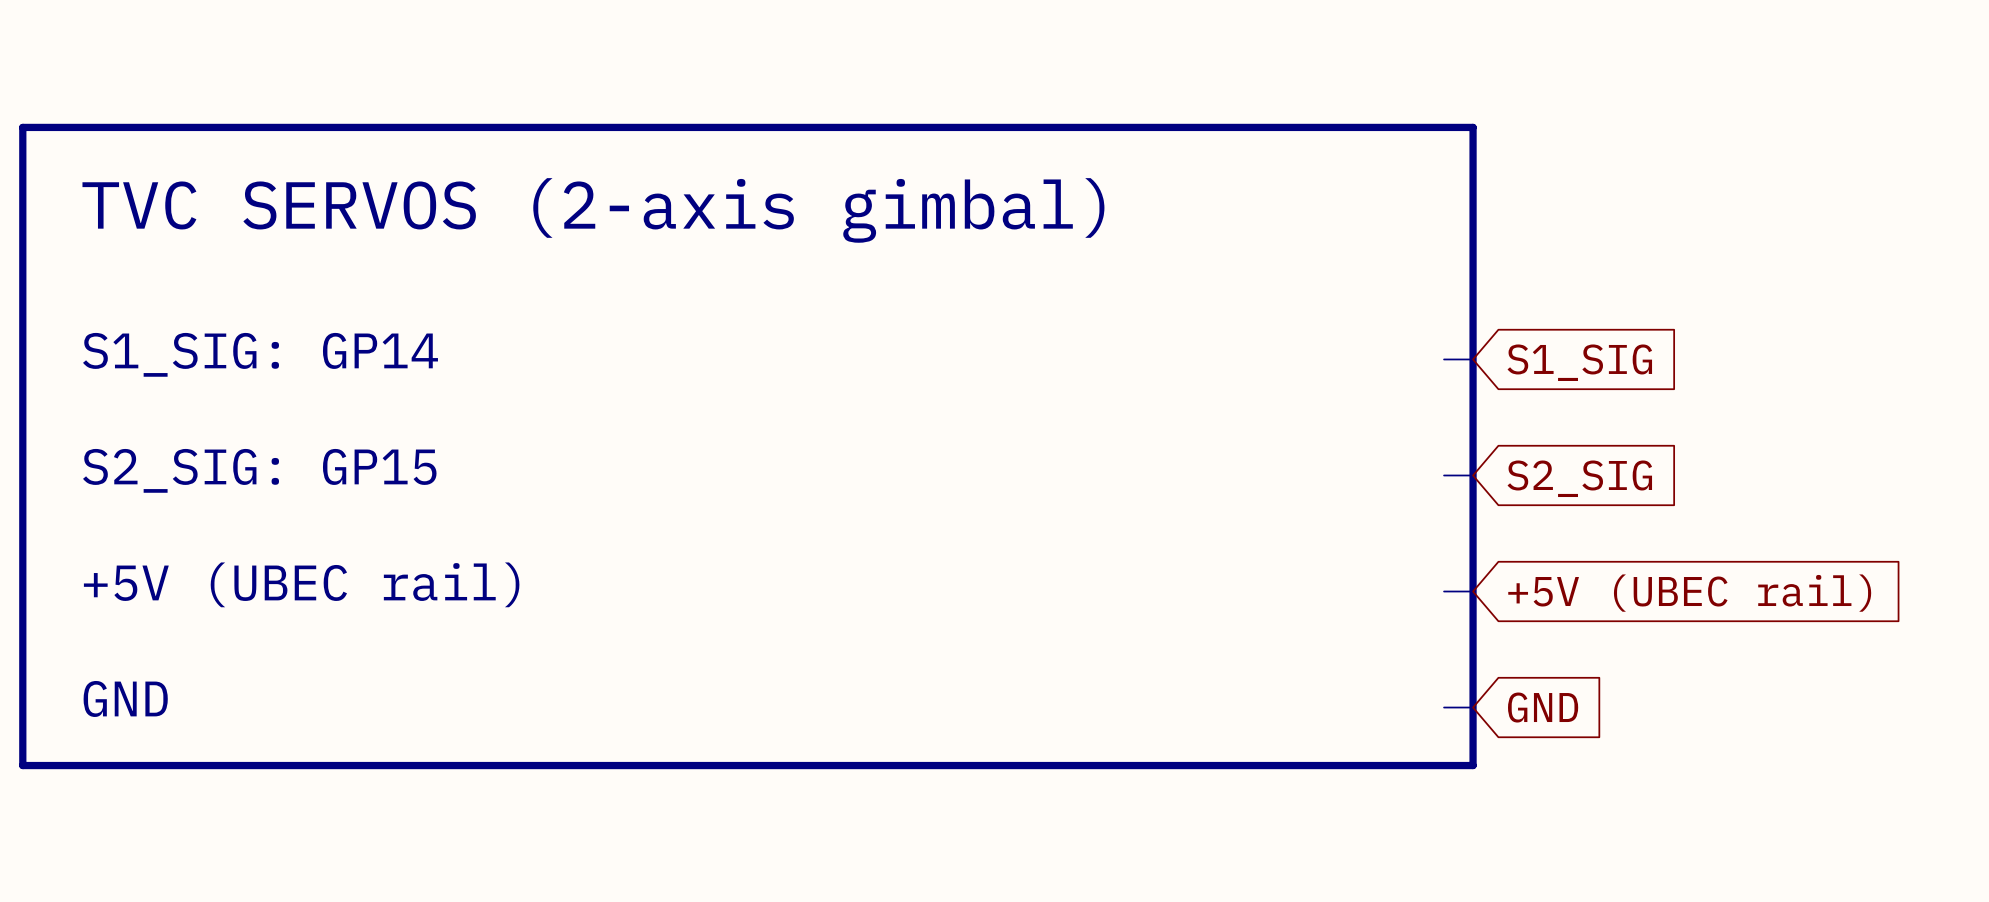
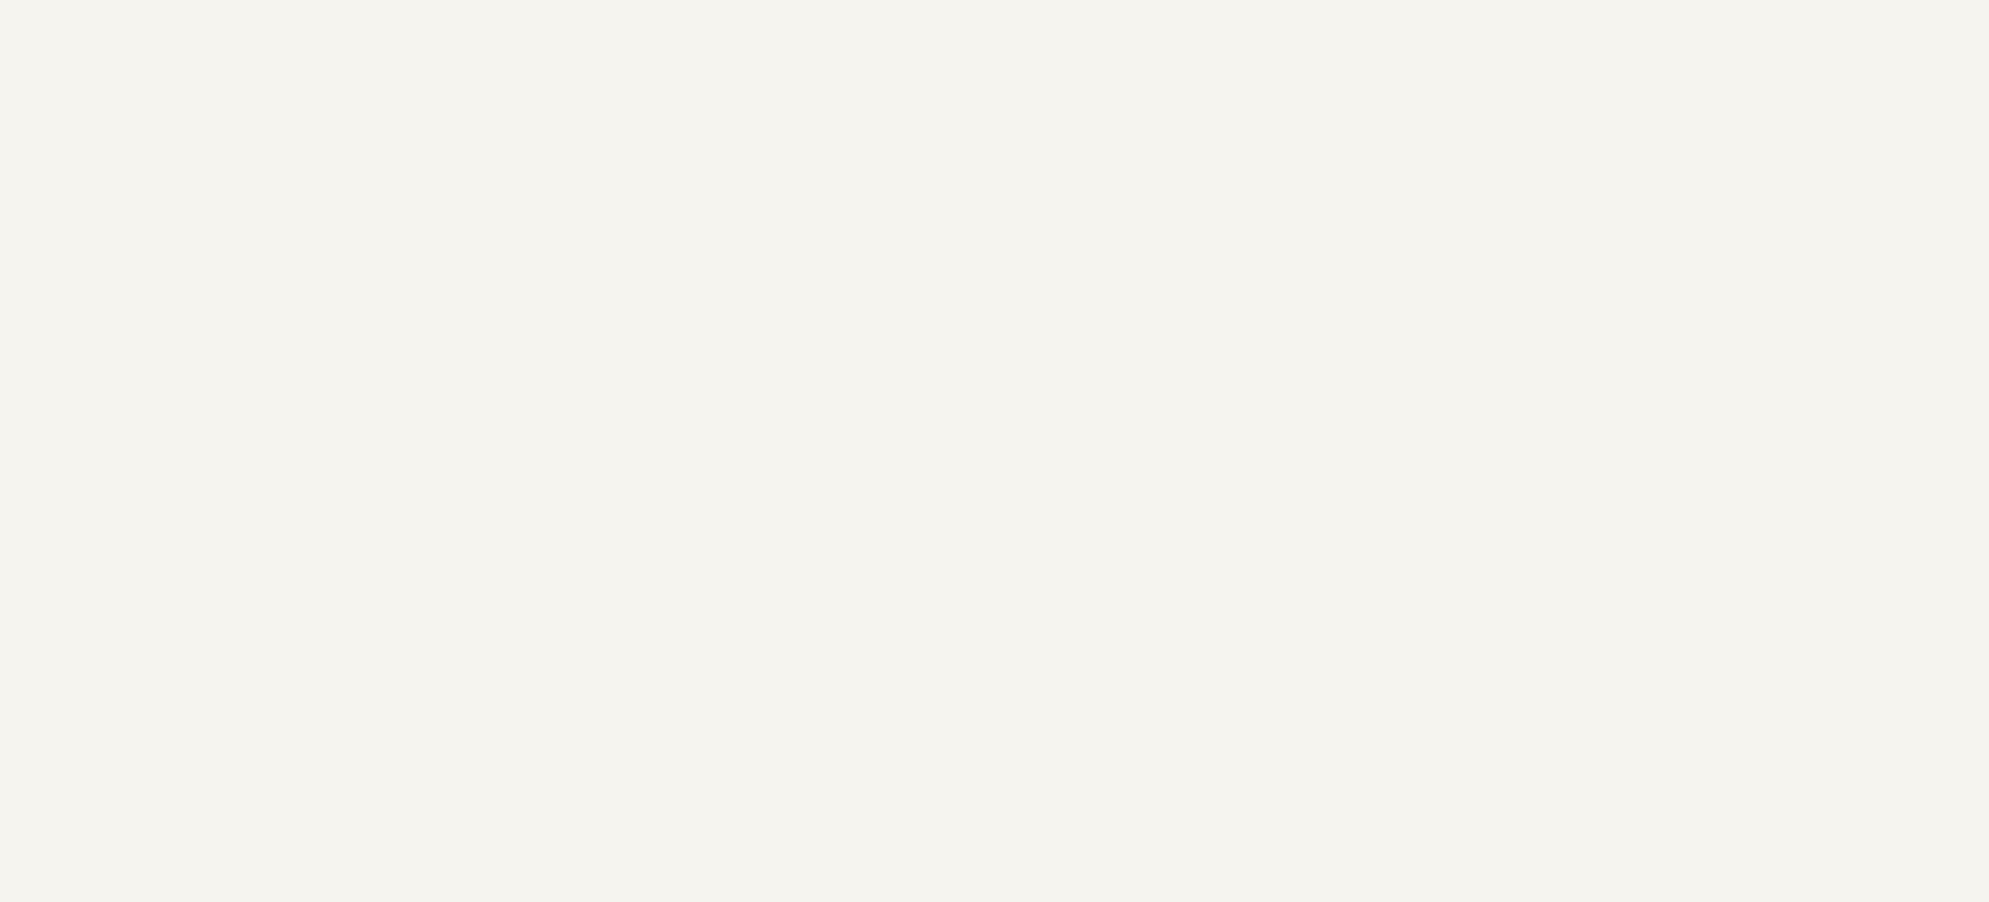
line: (22, 127) (1473, 127) (1473, 765) (22, 765) (22, 127) -> none
text: TVC SERVOS (2-axis gimbal) (593, 210) -> none
text: S1_SIG: GP14 (260, 354) -> none
wire: (1444, 359) (1473, 359) -> none
global label: S1_SIG (1579, 362) -> none
text: S2_SIG: GP15 (259, 470) -> none
wire: (1444, 475) (1473, 475) -> none
global label: S2_SIG (1579, 478) -> none
text: +5V (UBEC rail) (301, 584) -> none
wire: (1444, 591) (1473, 591) -> none
global label: +5V (UBEC rail) (1689, 593) -> none
text: GND (125, 698) -> none
wire: (1444, 707) (1473, 707) -> none
global label: GND (1543, 707) -> none

